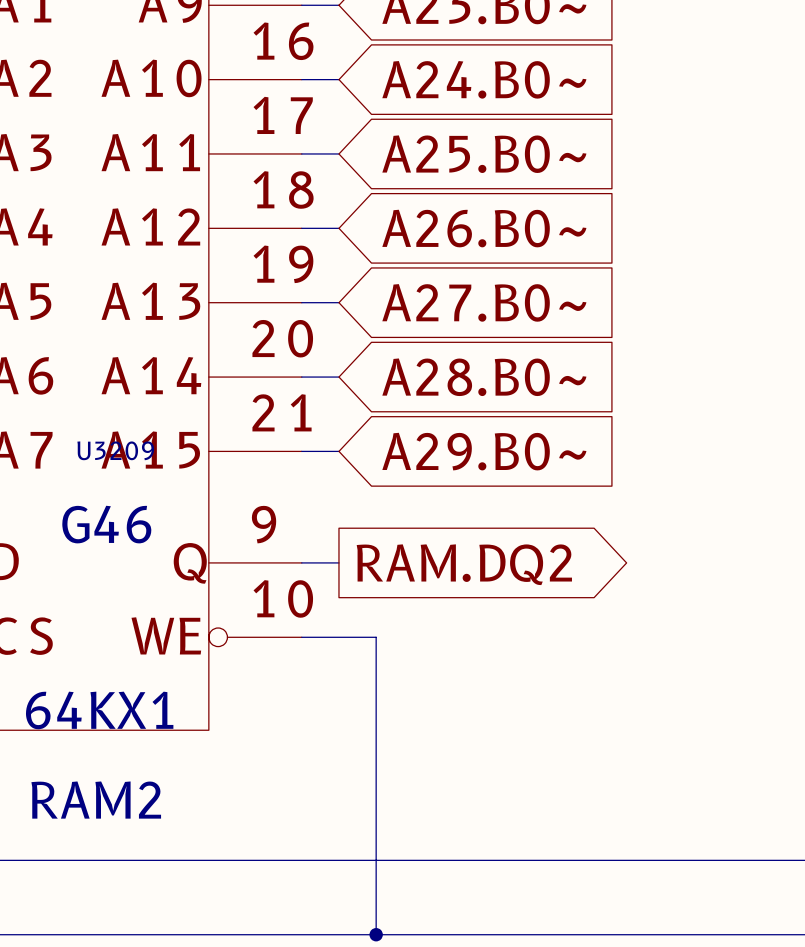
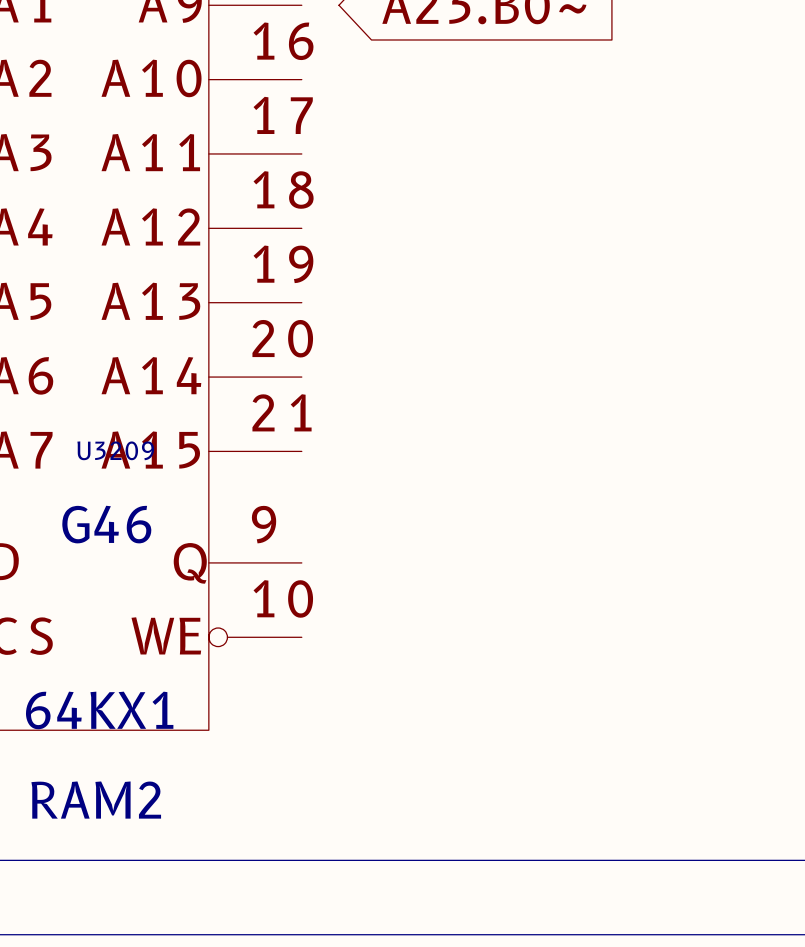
wire: (301, 5) (338, 5) -> none
wire: (301, 79) (338, 79) -> none
global label: A24.B0~ (484, 79) -> none
wire: (301, 153) (338, 153) -> none
global label: A25.B0~ (484, 154) -> none
wire: (301, 228) (338, 228) -> none
global label: A26.B0~ (484, 228) -> none
wire: (301, 302) (338, 302) -> none
global label: A27.B0~ (484, 302) -> none
wire: (301, 377) (338, 377) -> none
global label: A28.B0~ (484, 377) -> none
wire: (301, 451) (338, 451) -> none
global label: A29.B0~ (484, 451) -> none
wire: (301, 562) (338, 562) -> none
global label: RAM.DQ2 (464, 564) -> none
wire: (301, 637) (376, 637) (376, 934) -> none
junction: (376, 934) -> none

